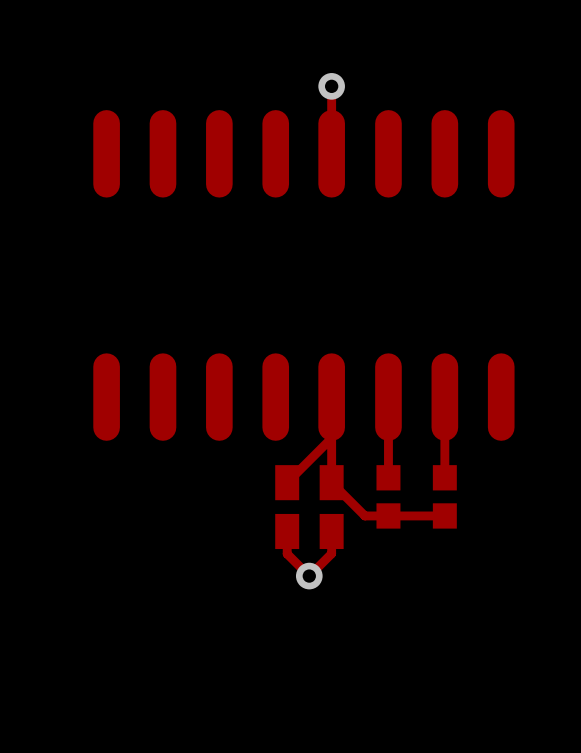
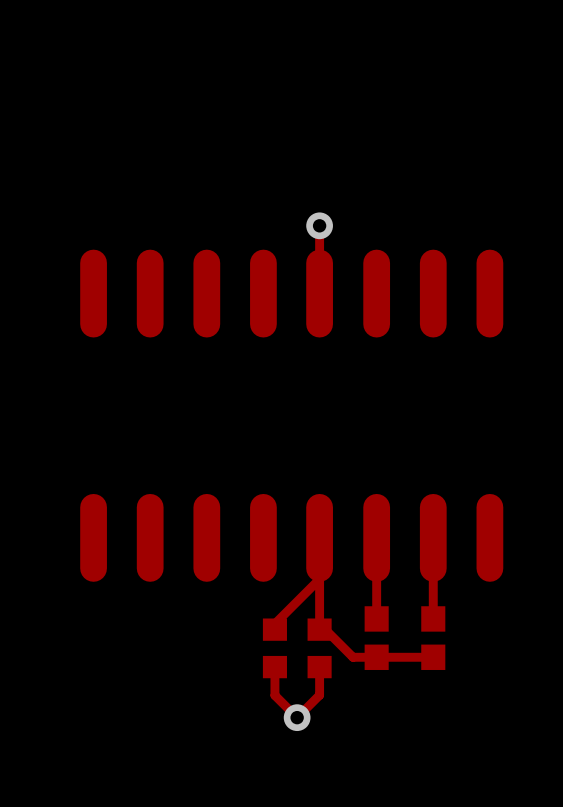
part footprint: [275, 465, 300, 550] -> [262, 618, 287, 679]
part footprint: [319, 465, 344, 550] -> [307, 618, 332, 679]

